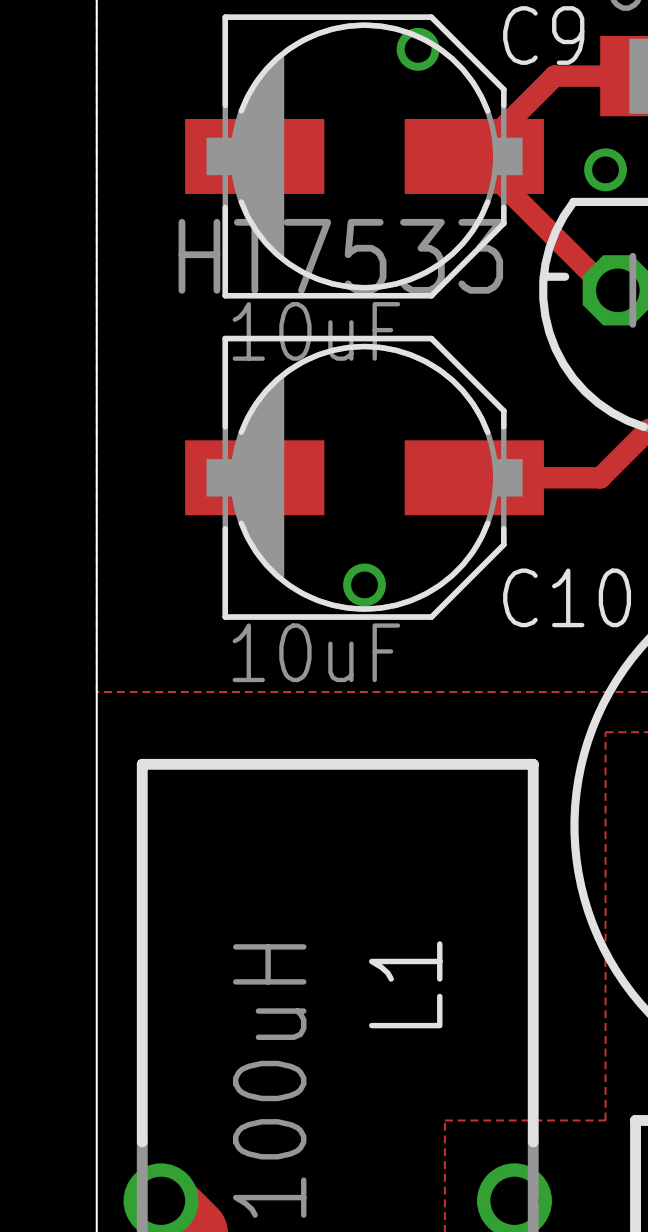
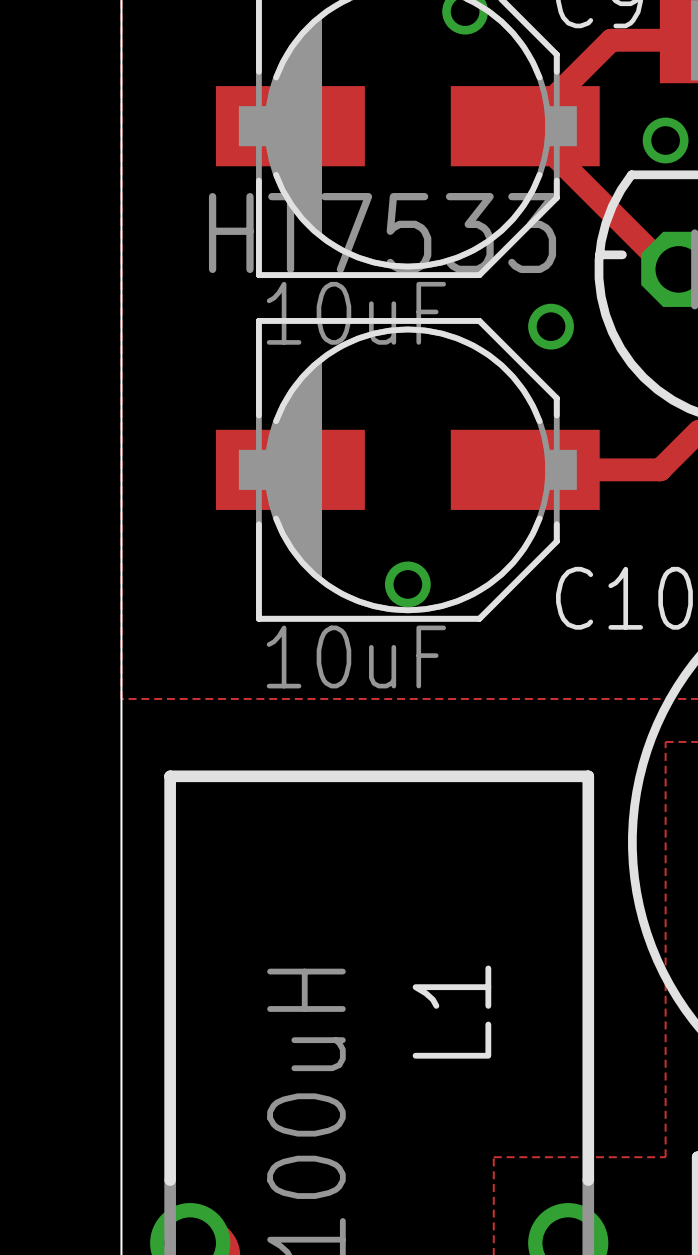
via: none -> (551, 326)

